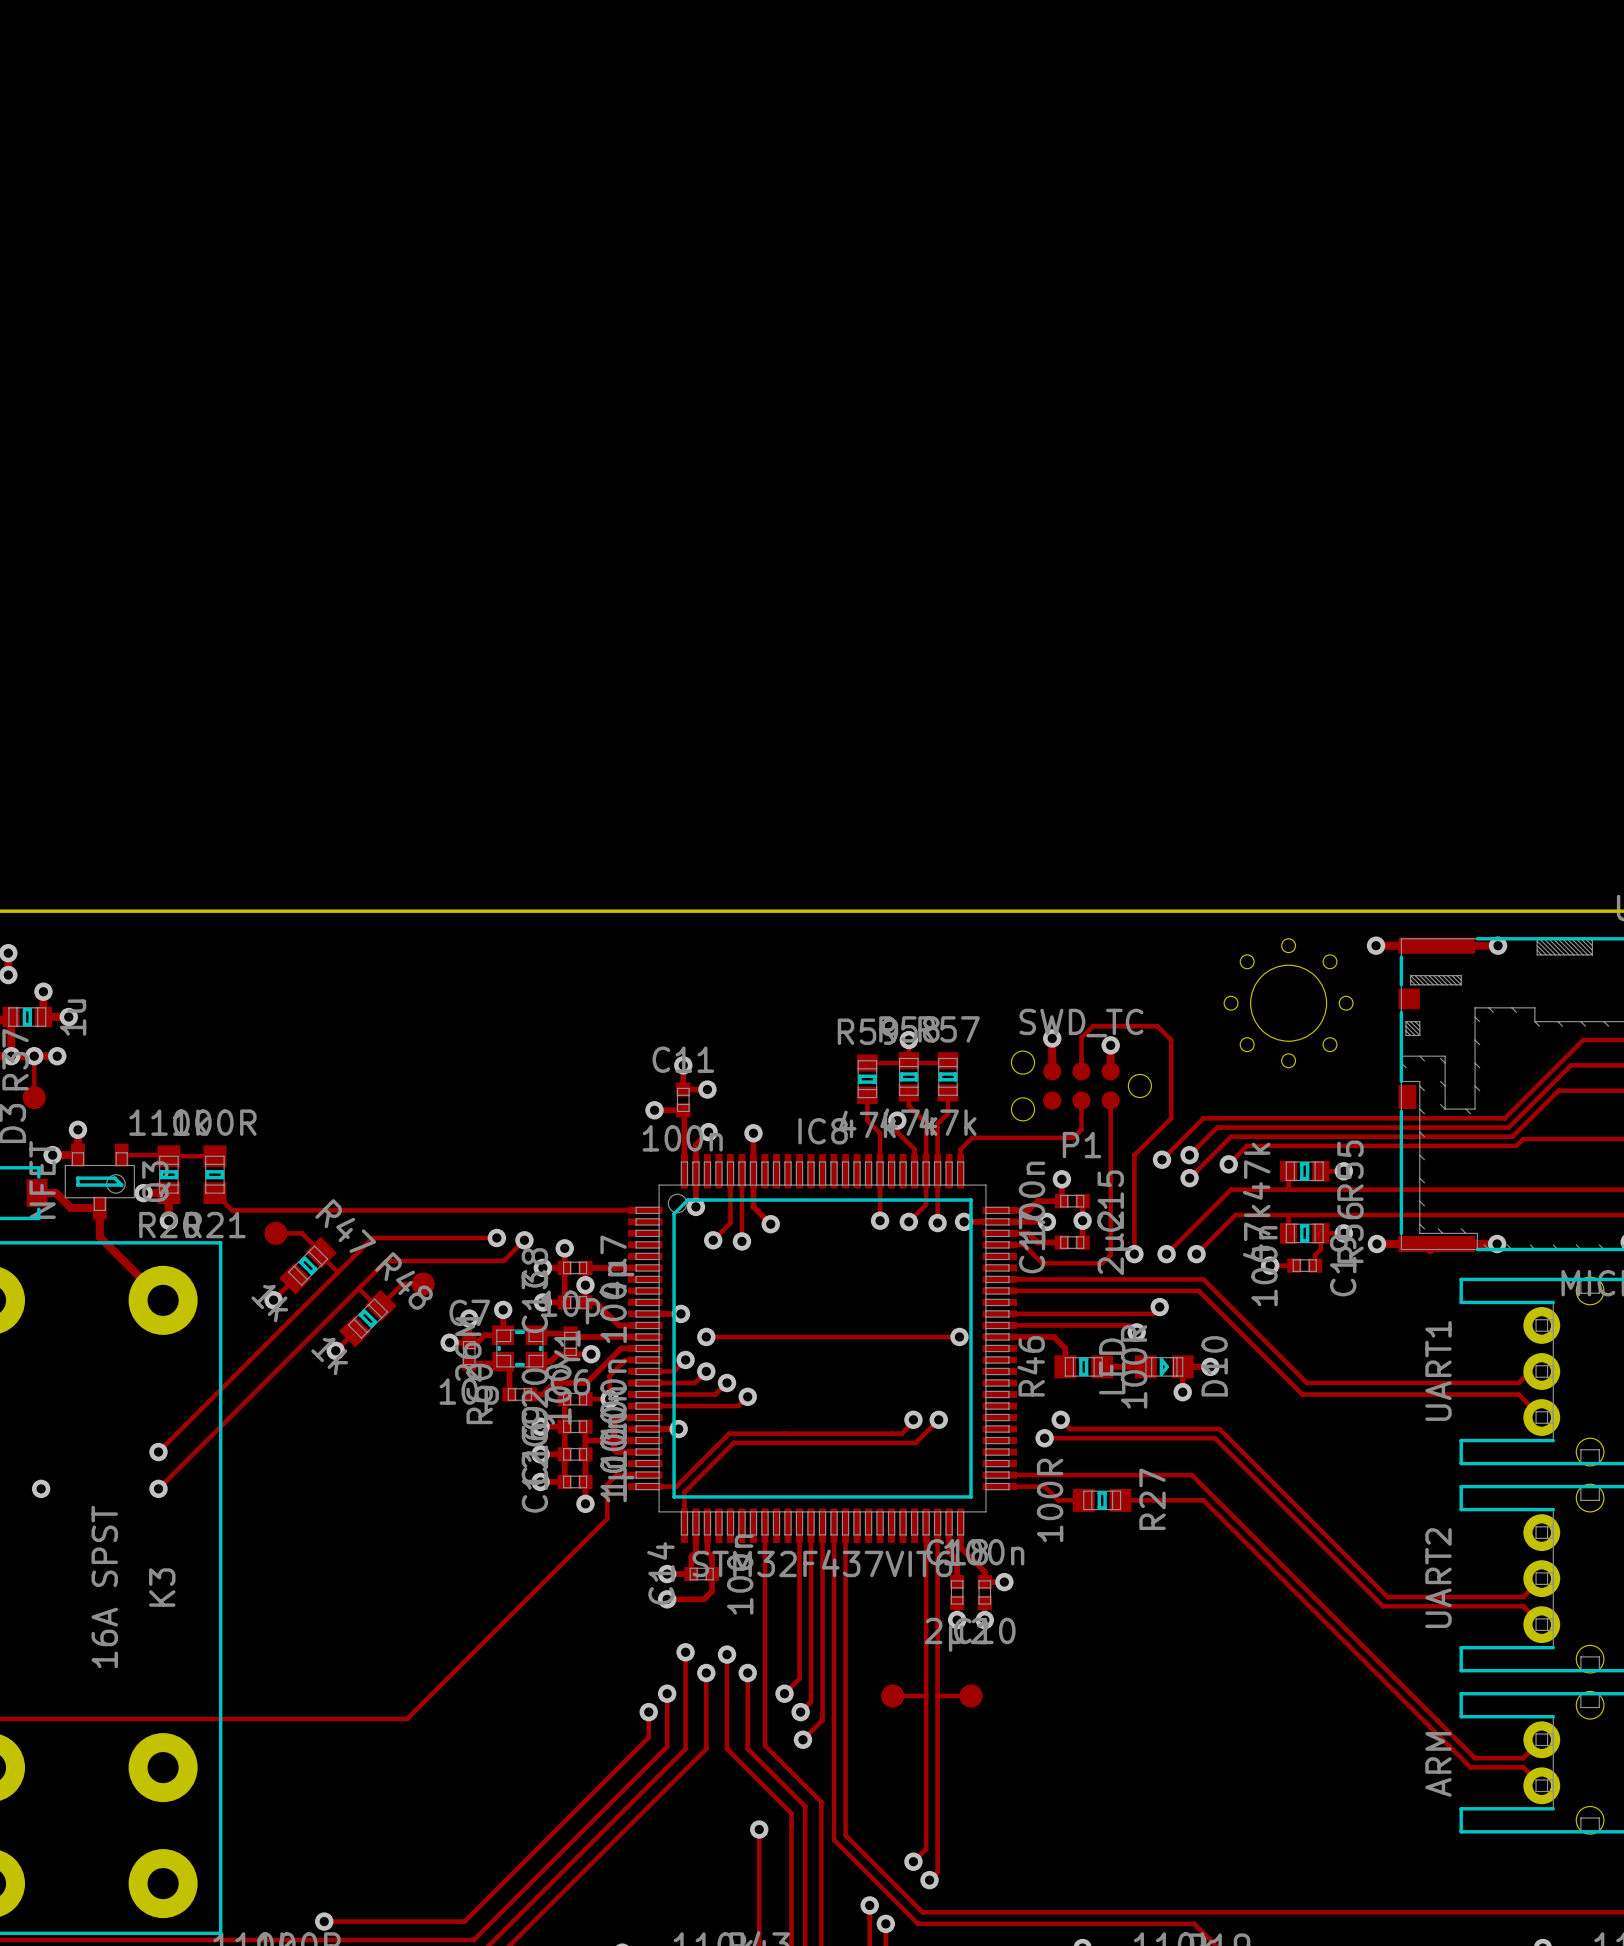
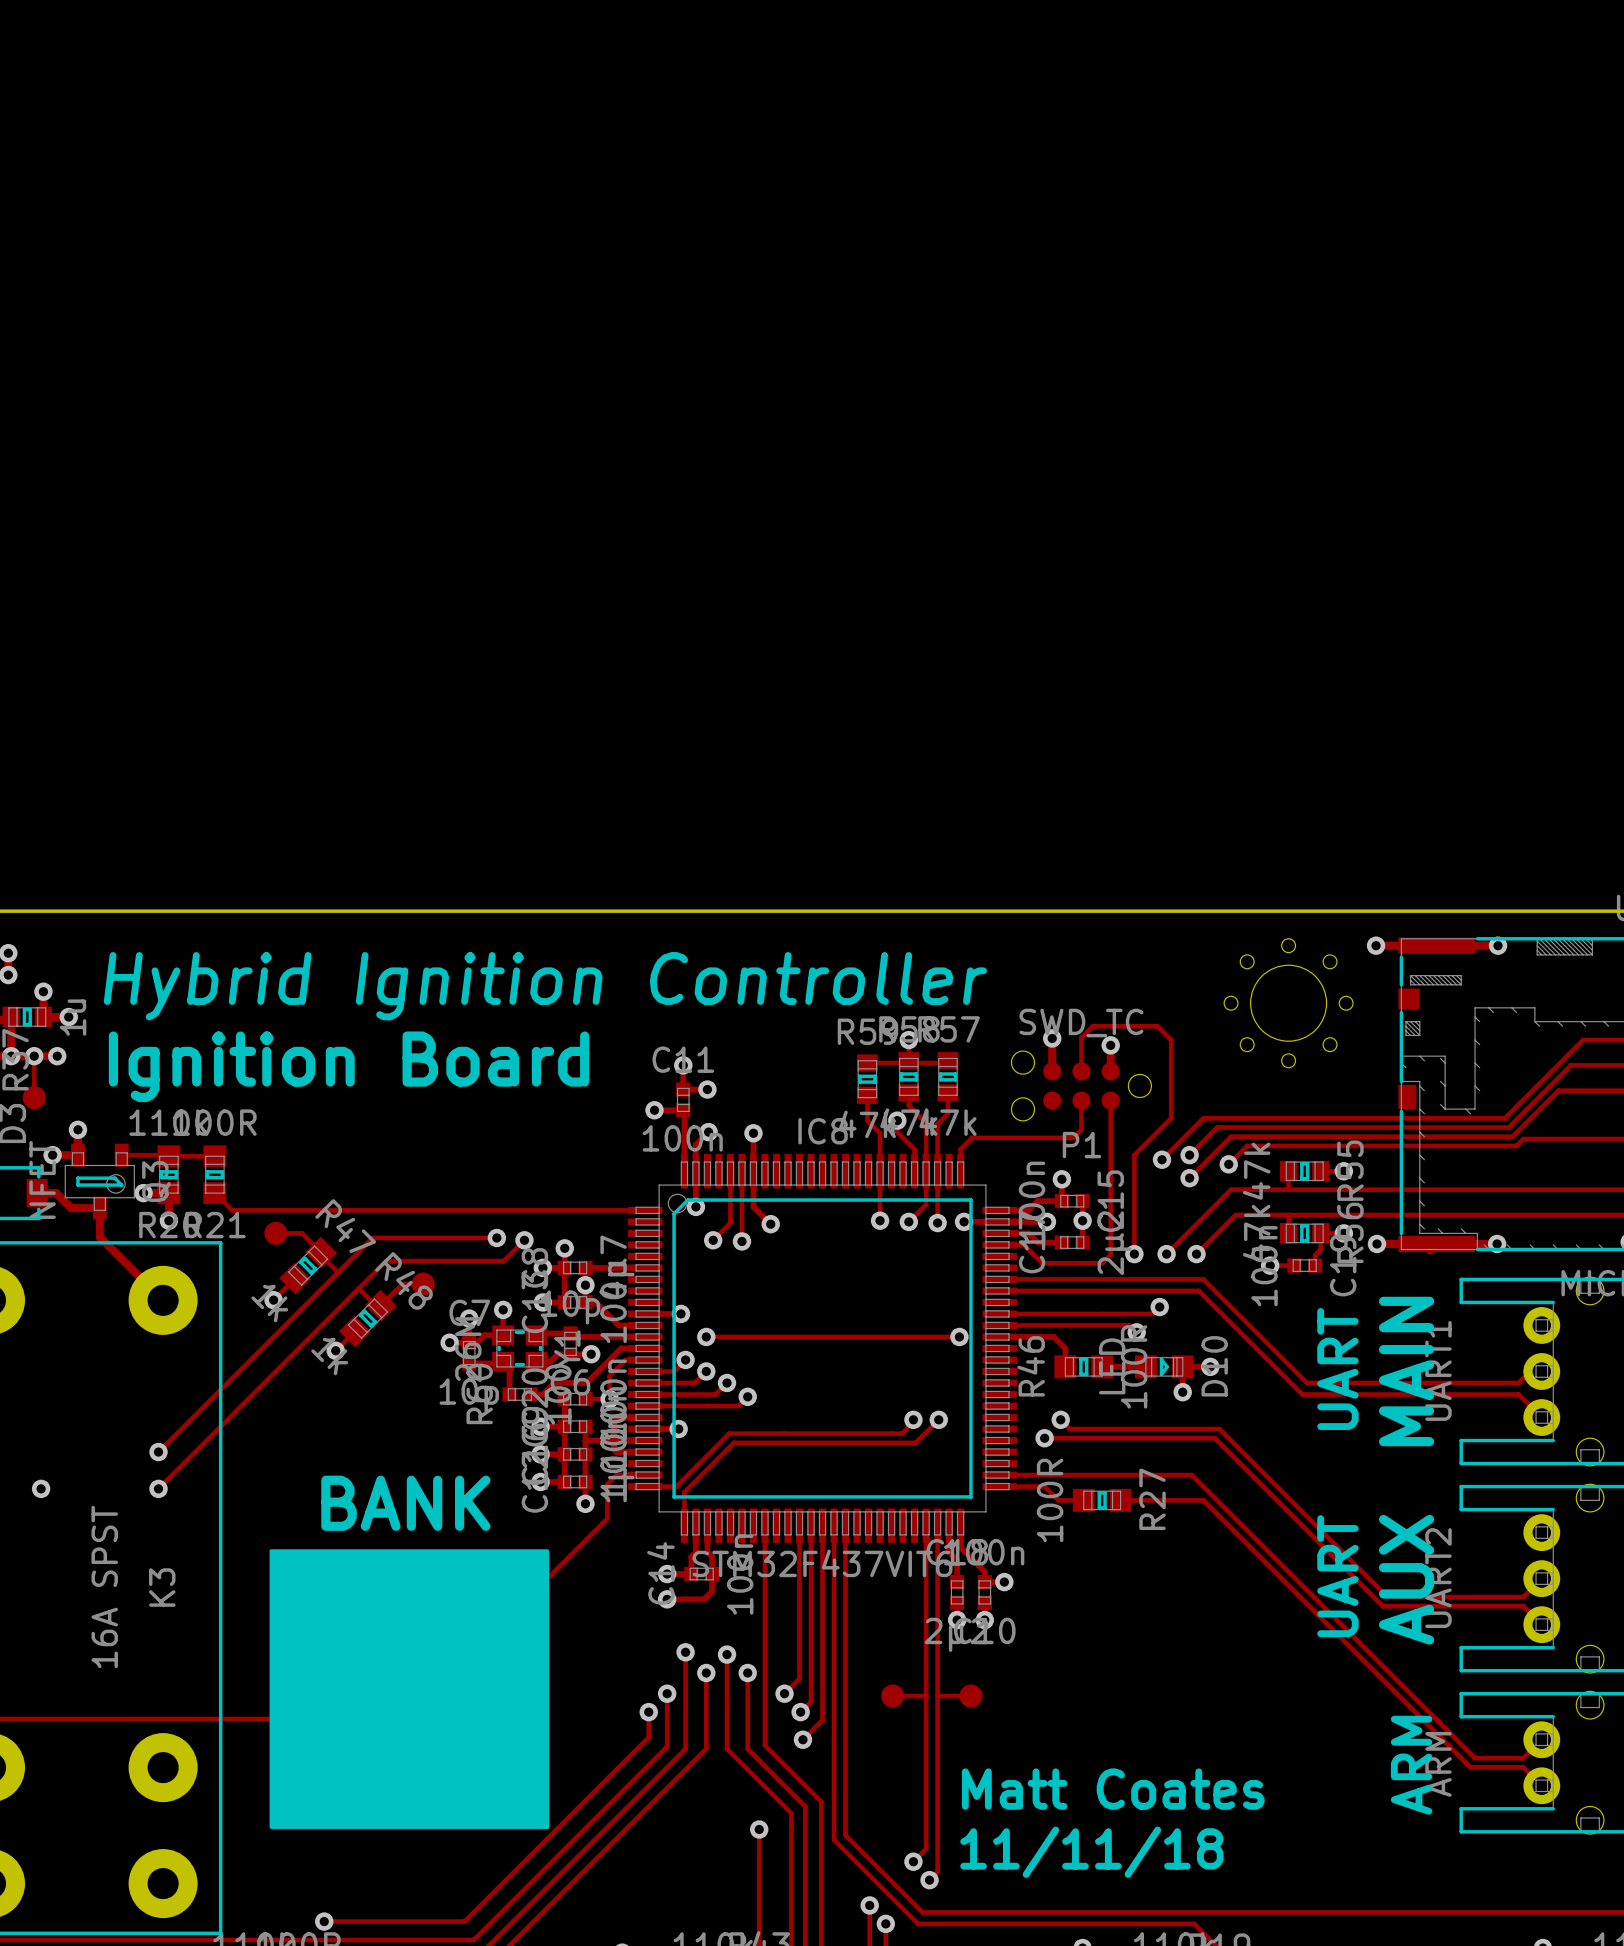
text: none -> Hybrid Ignition Controller (545, 986)
text: none -> Ignition Board (349, 1066)
text: none -> UART (1337, 1369)
text: none -> MAIN (1406, 1371)
text: none -> BANK (405, 1503)
drawing: none -> [269, 1549, 550, 1829]
text: none -> UART (1337, 1576)
text: none -> AUX (1406, 1579)
text: none -> ARM (1411, 1765)
text: none -> Matt Coates (1113, 1789)
text: none -> 11/11/18 (1091, 1852)

